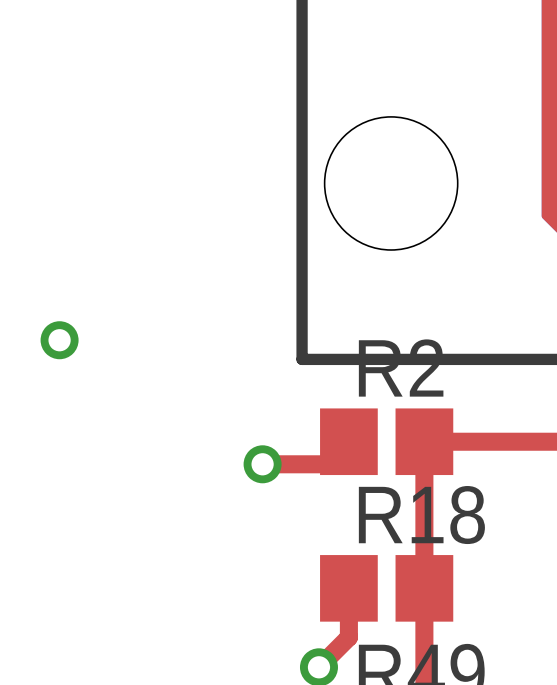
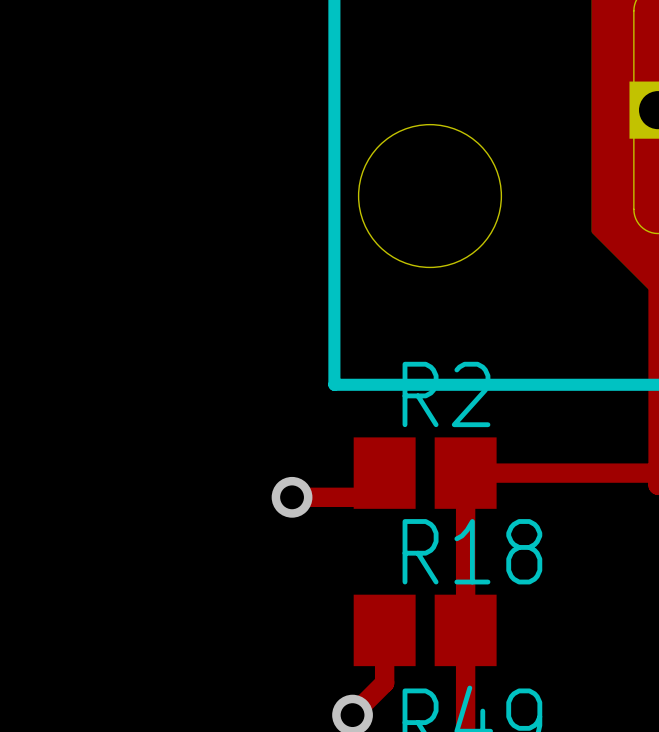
via: (59, 340) -> none

